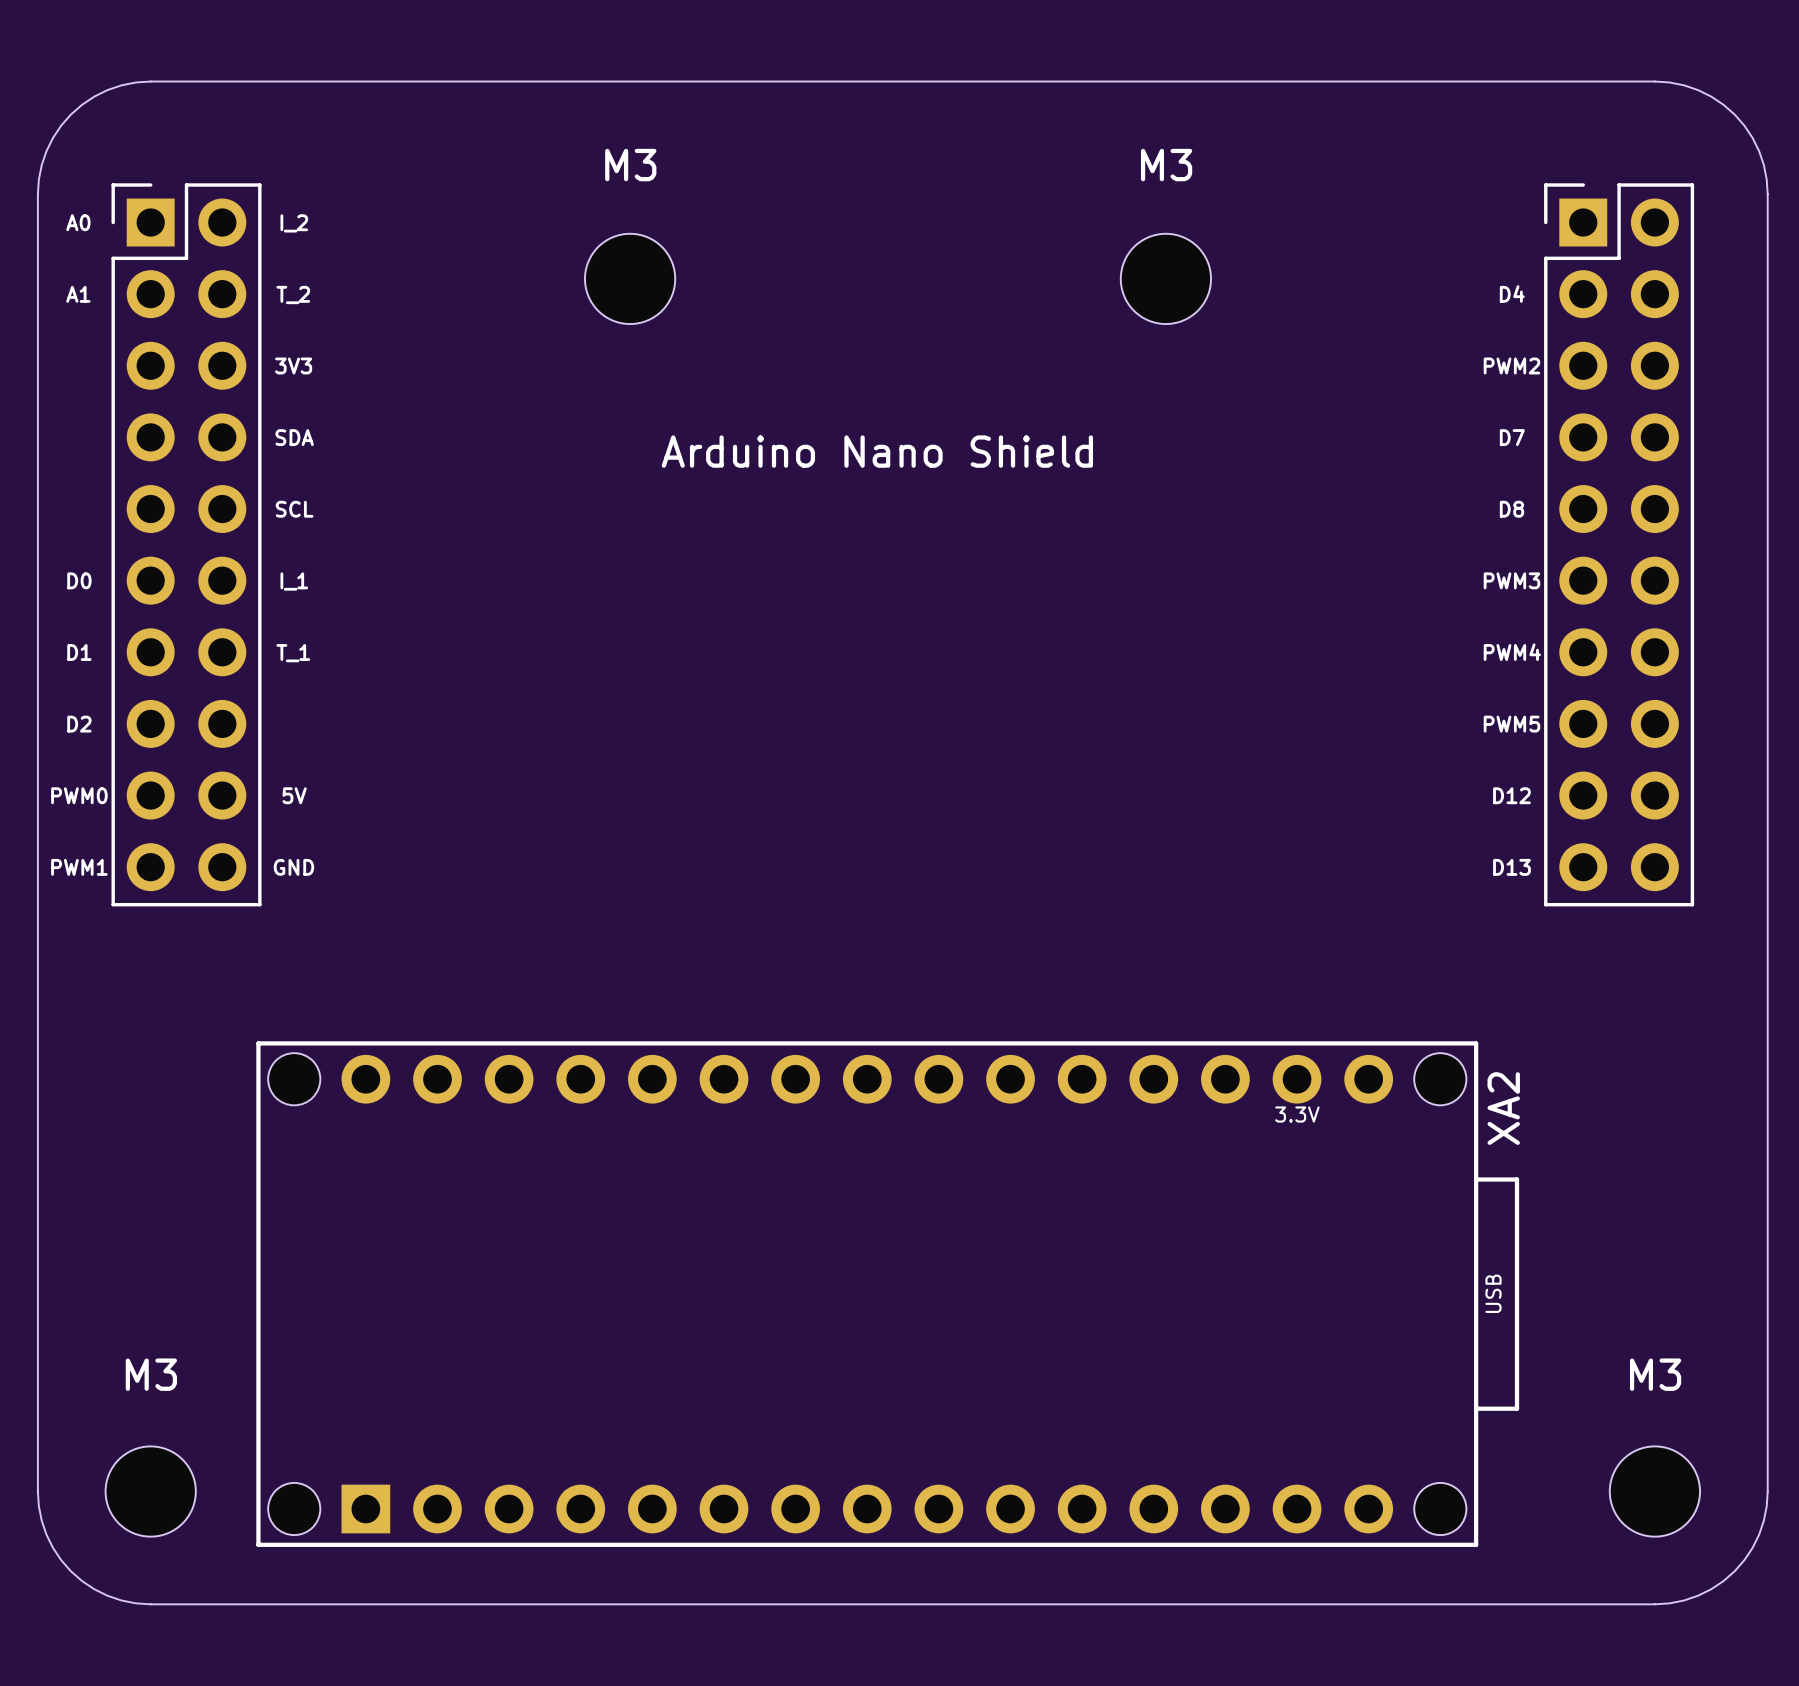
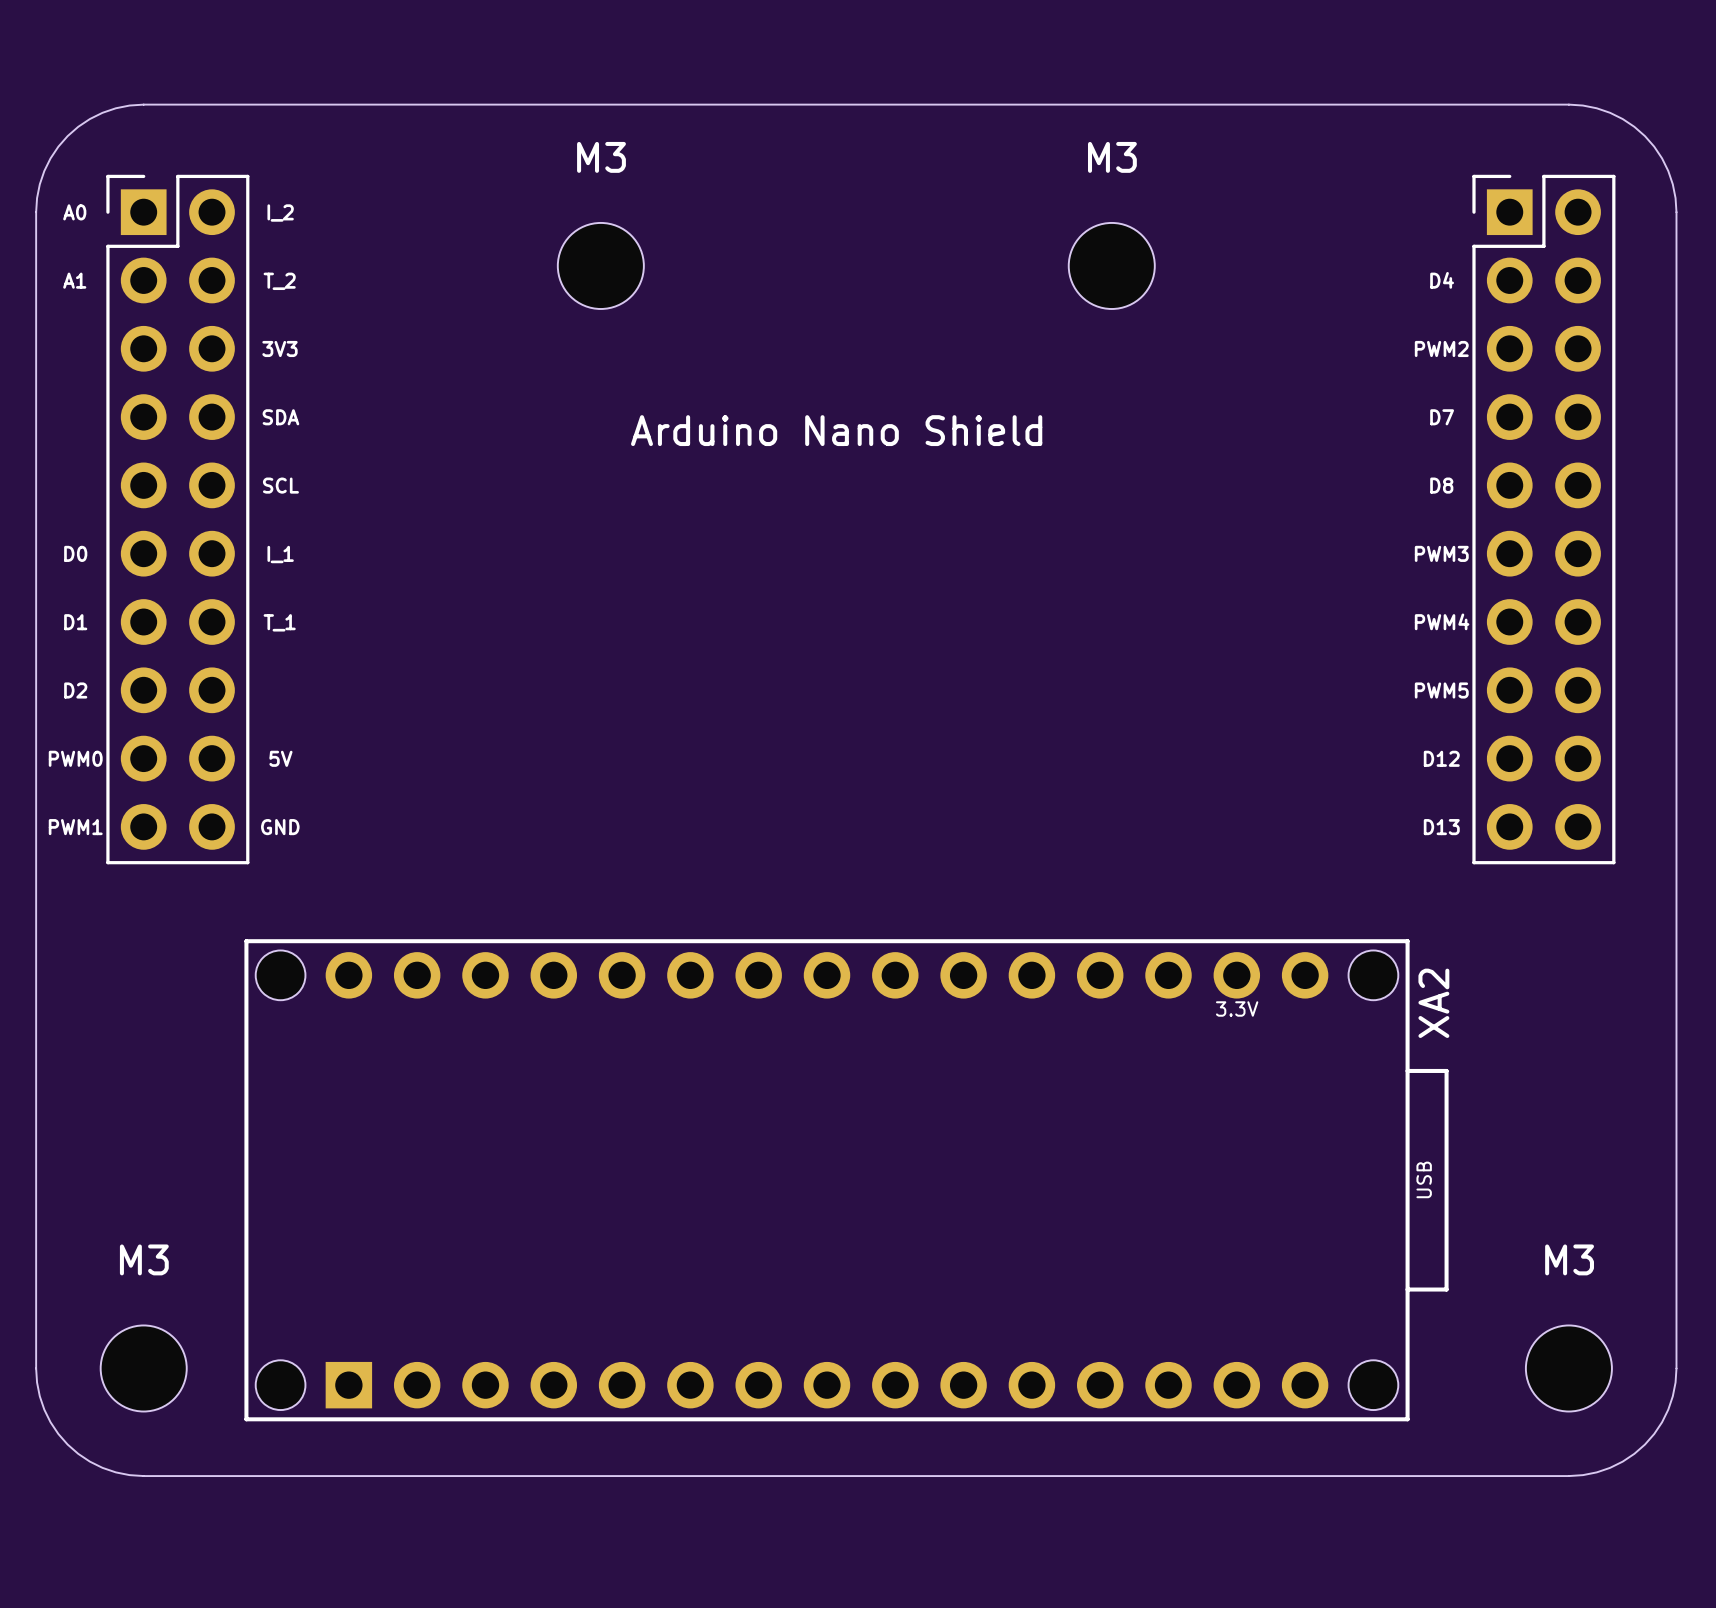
board edge: (37, 222) (38, 179) (41, 165) (46, 151) (61, 125) (82, 104) (94, 96) (107, 90) (135, 82) (1654, 81) (1669, 82) (1698, 90) (1723, 104) (1734, 114) (1752, 137) (1763, 165) (1767, 194) (1767, 1491) (1763, 1520) (1759, 1534) (1752, 1547) (1734, 1571) (1723, 1581) (1698, 1595) (1669, 1603) (150, 1604) (121, 1600) (94, 1589) (70, 1571) (53, 1547) (41, 1520) (38, 1506) (37, 1435) -> (36, 212) (39, 184) (44, 171) (58, 146) (67, 136) (89, 119) (102, 112) (129, 105) (143, 104) (1582, 105) (1610, 112) (1622, 119) (1644, 136) (1662, 158) (1668, 171) (1672, 184) (1676, 212) (1676, 1368) (1672, 1396) (1662, 1422) (1654, 1433) (1634, 1453) (1610, 1467) (1596, 1472) (1568, 1476) (143, 1476) (115, 1472) (102, 1467) (78, 1453) (67, 1444) (58, 1433) (44, 1409) (39, 1396) (36, 1368)
XA2 position: (887, 1294) -> (846, 1180)
text position: M3 (151, 1374) -> M3 (144, 1259)
text position: M3 (1655, 1374) -> M3 (1569, 1259)
part position: (150, 1491) -> (143, 1368)
part position: (1654, 1491) -> (1568, 1368)

